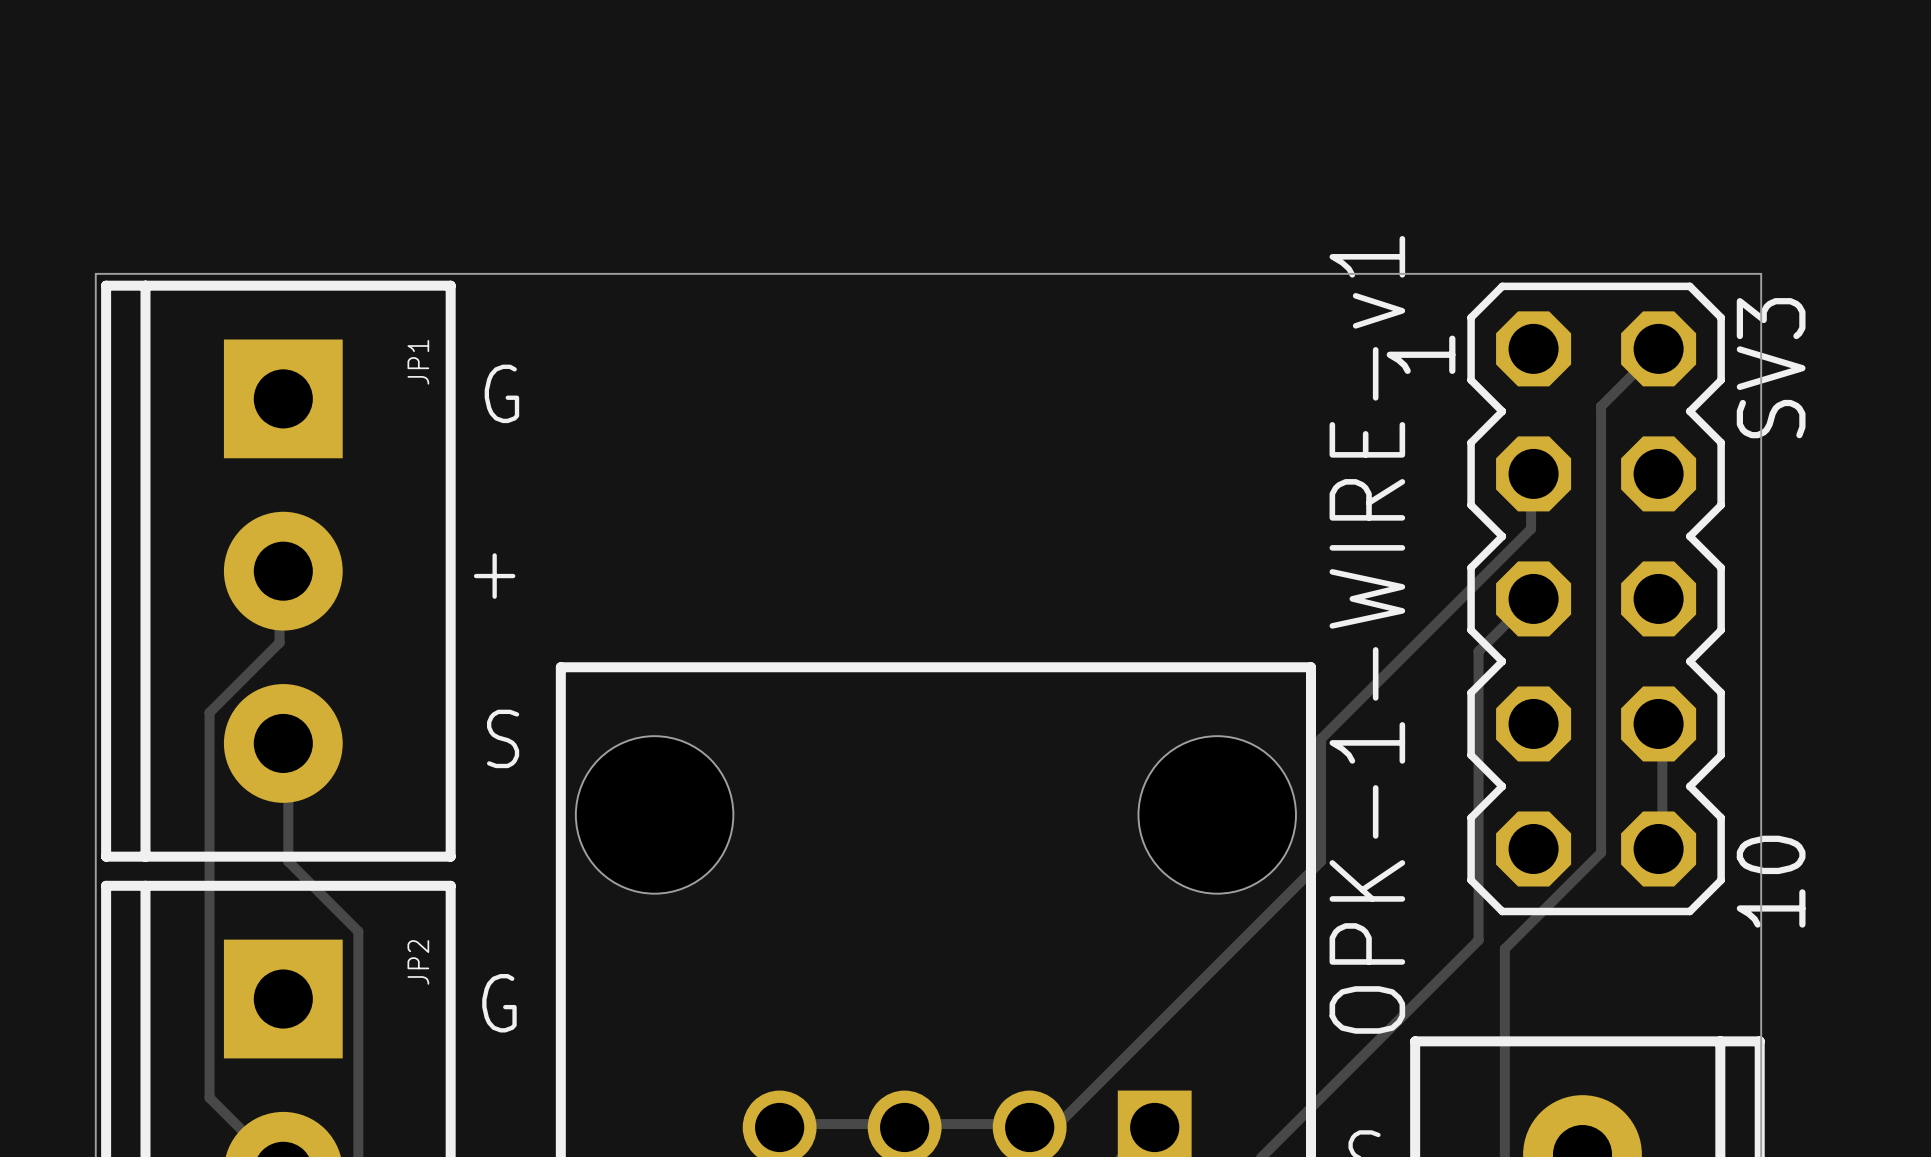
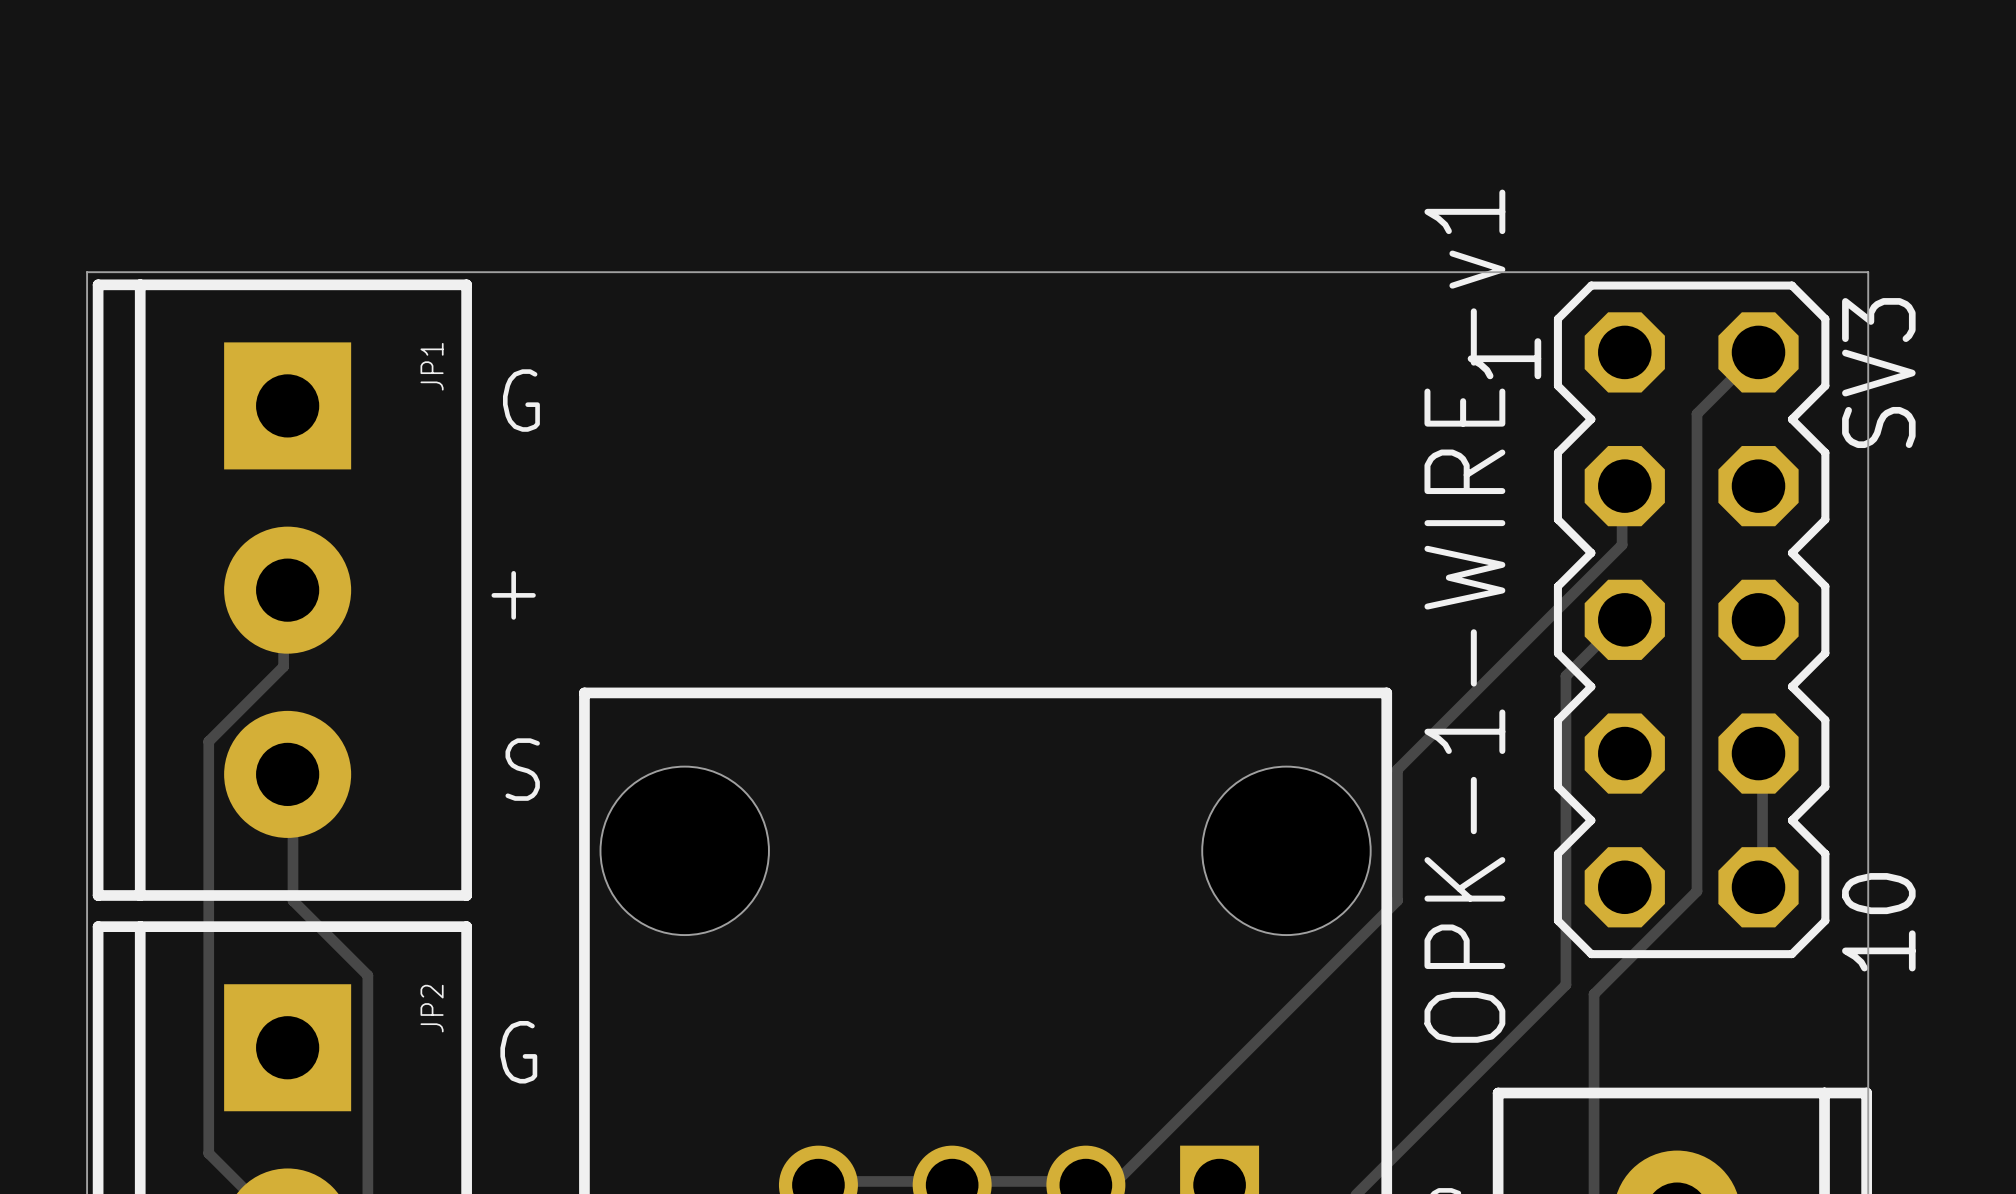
text position: OPK-1-WIRE-v1 (1367, 634) -> OPK-1-WIRE-v1 (1464, 616)

